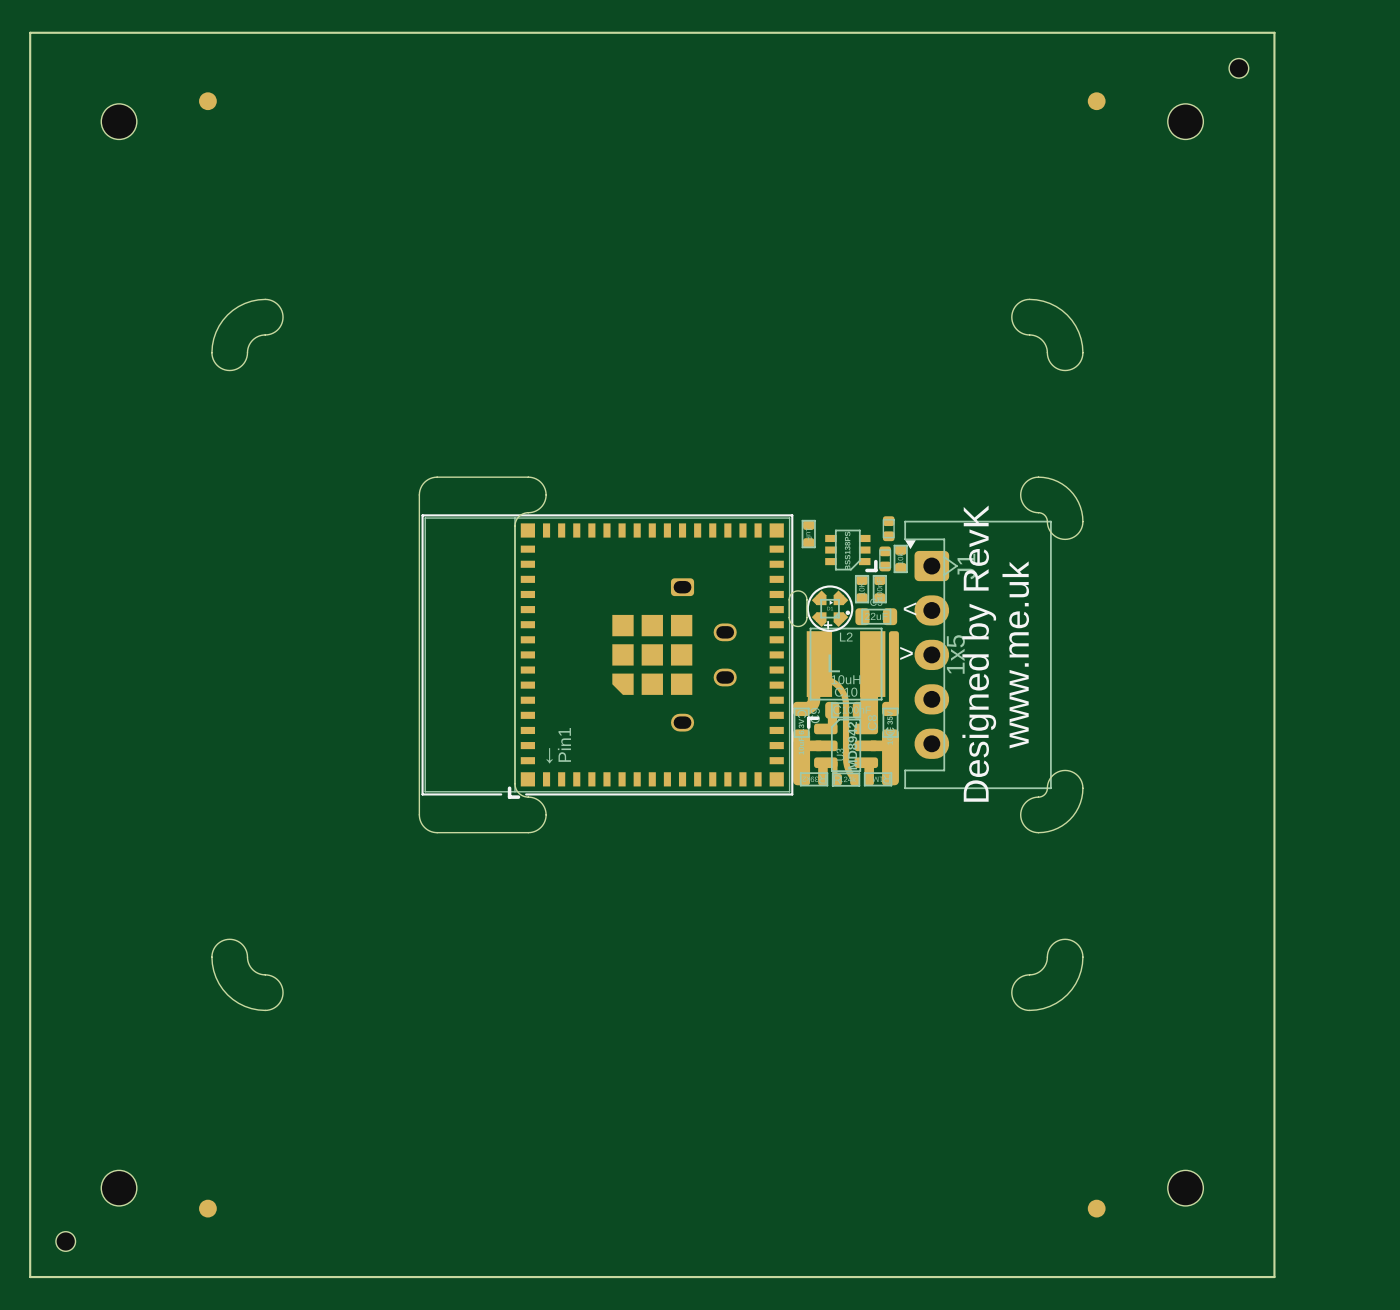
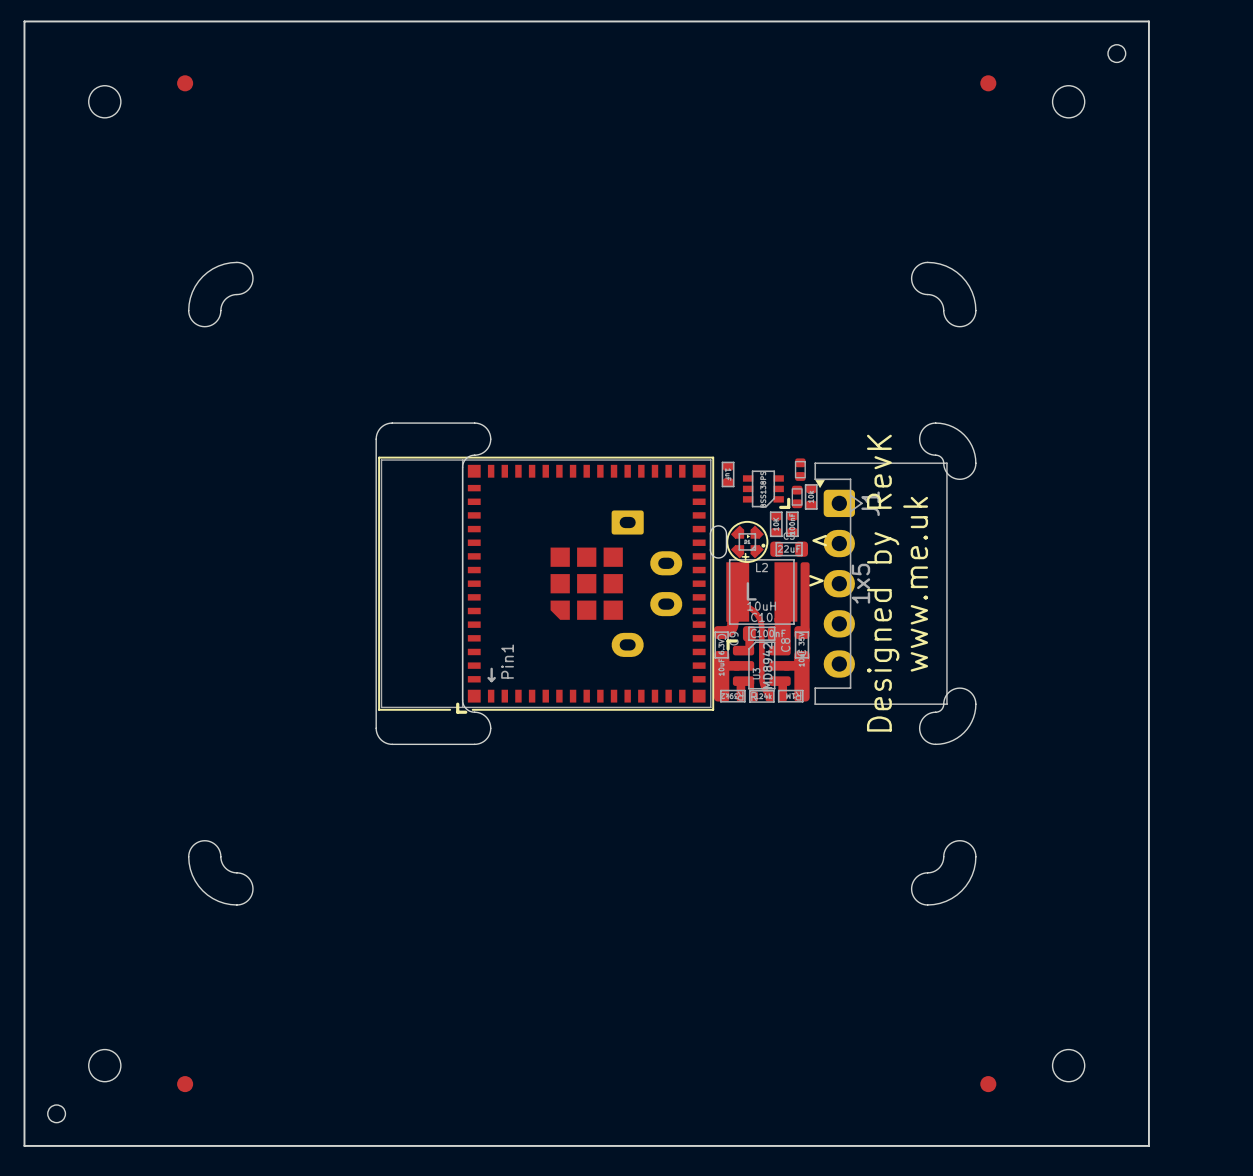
part footprint: [670, 578, 737, 732] -> [611, 510, 683, 657]

